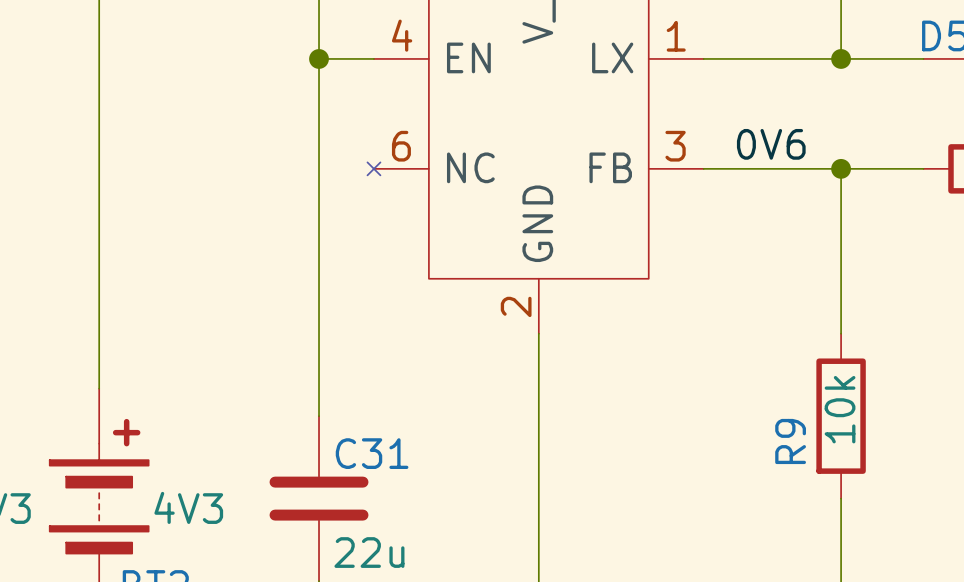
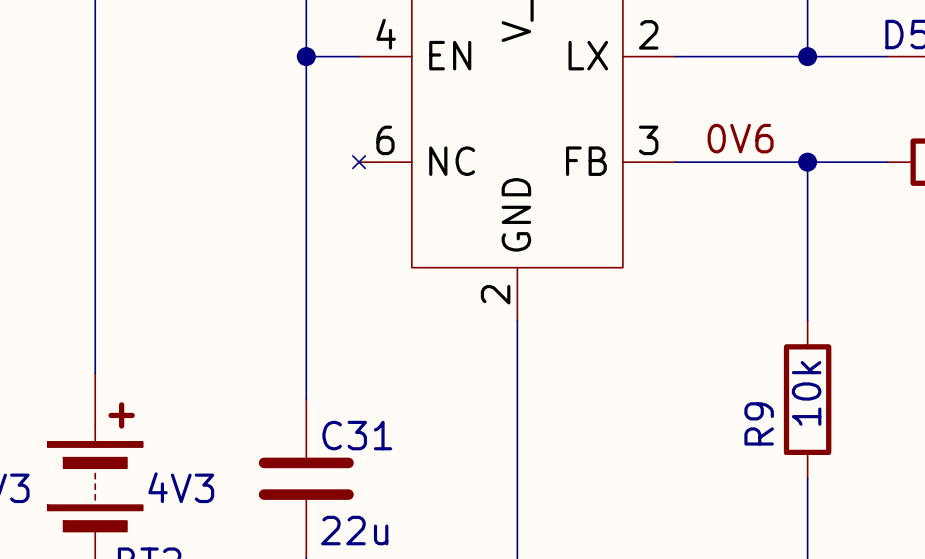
part pin number: 1 (676, 36) -> 2 (648, 34)

